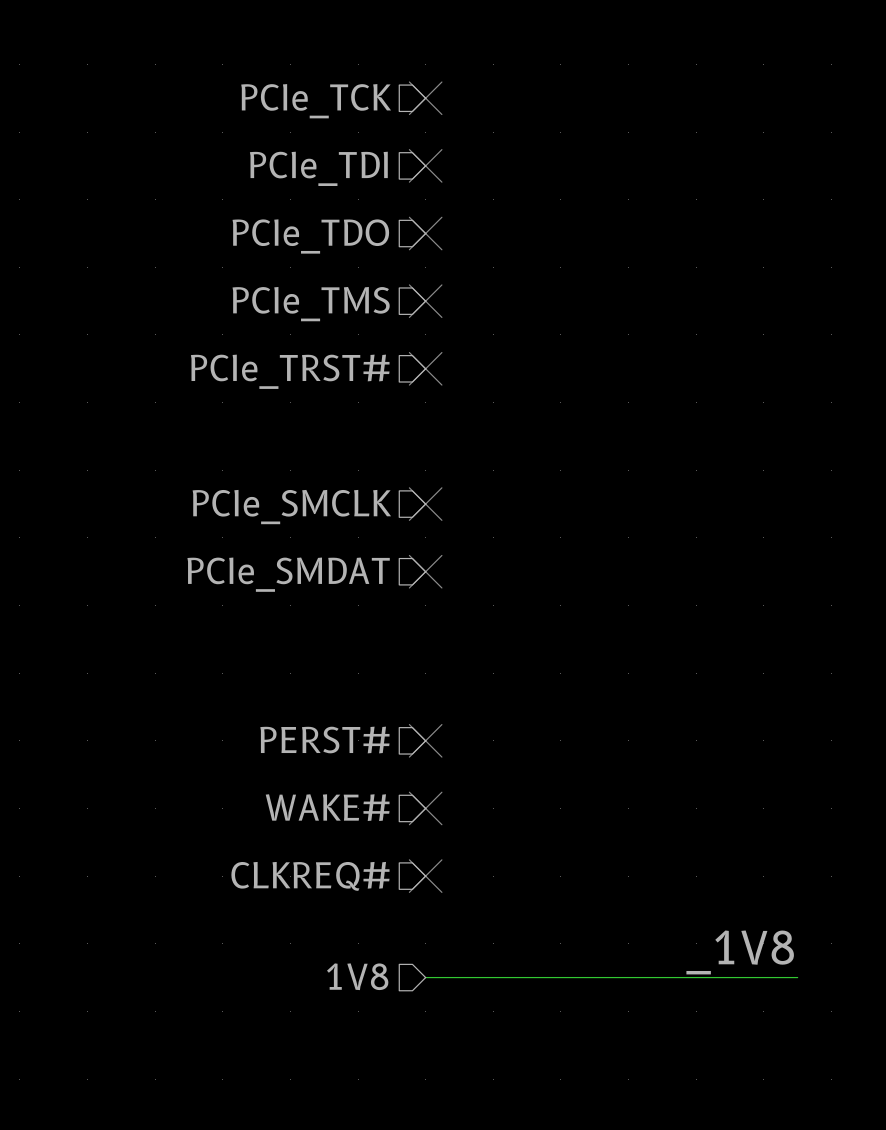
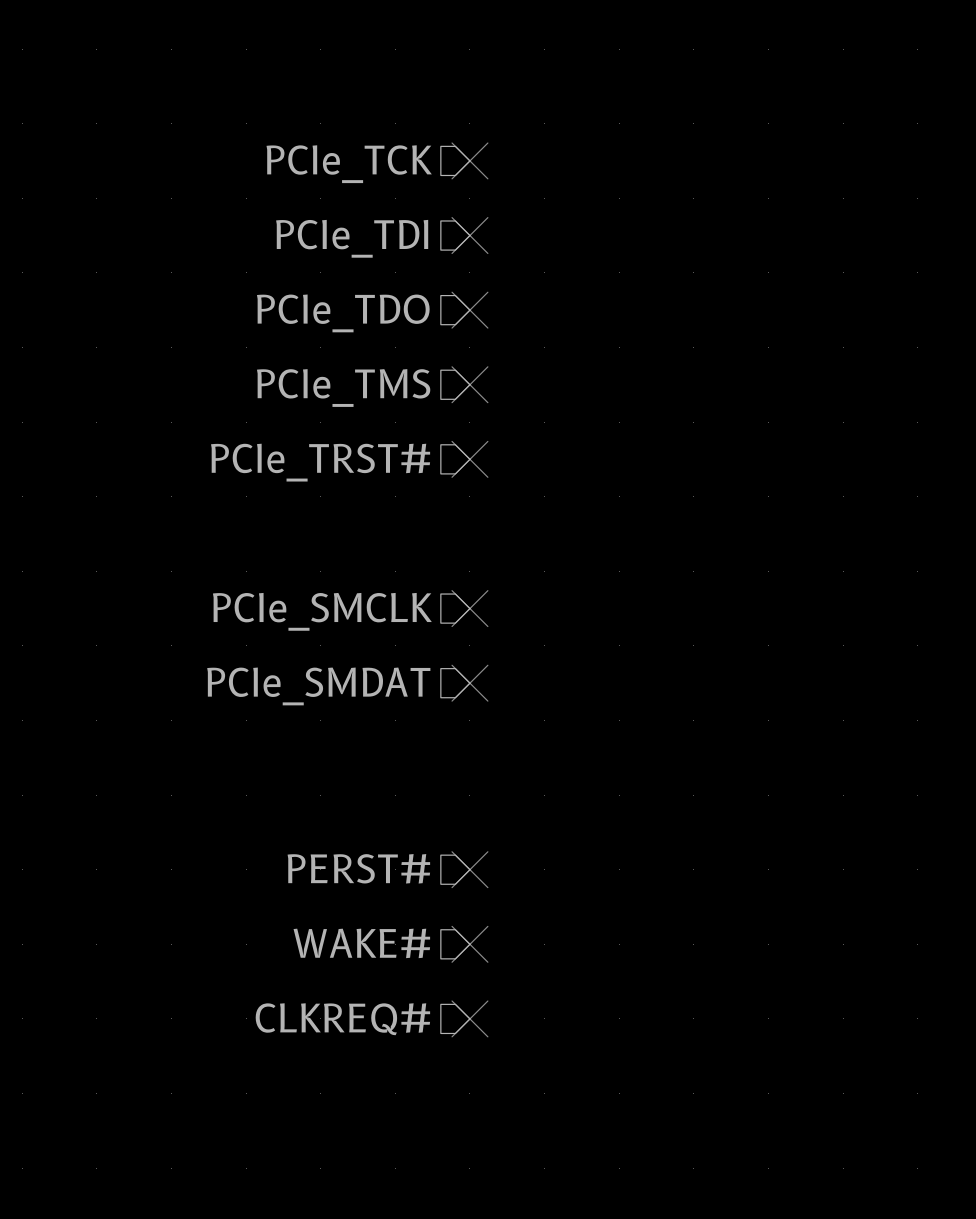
label: _1V8 (740, 952) -> none
hierarchical label: 1V8 (357, 976) -> none
wire: (425, 977) (797, 977) -> none

